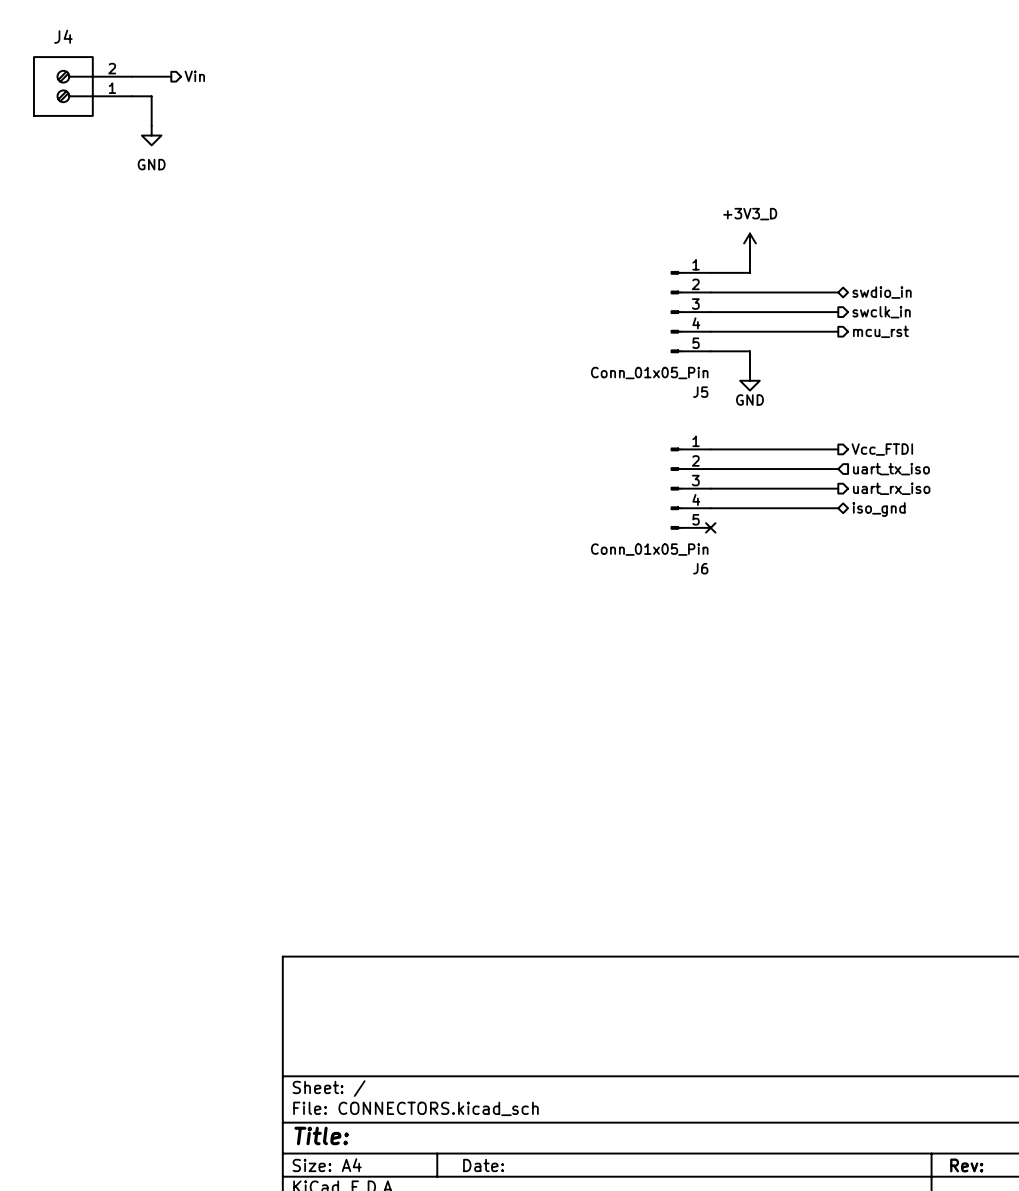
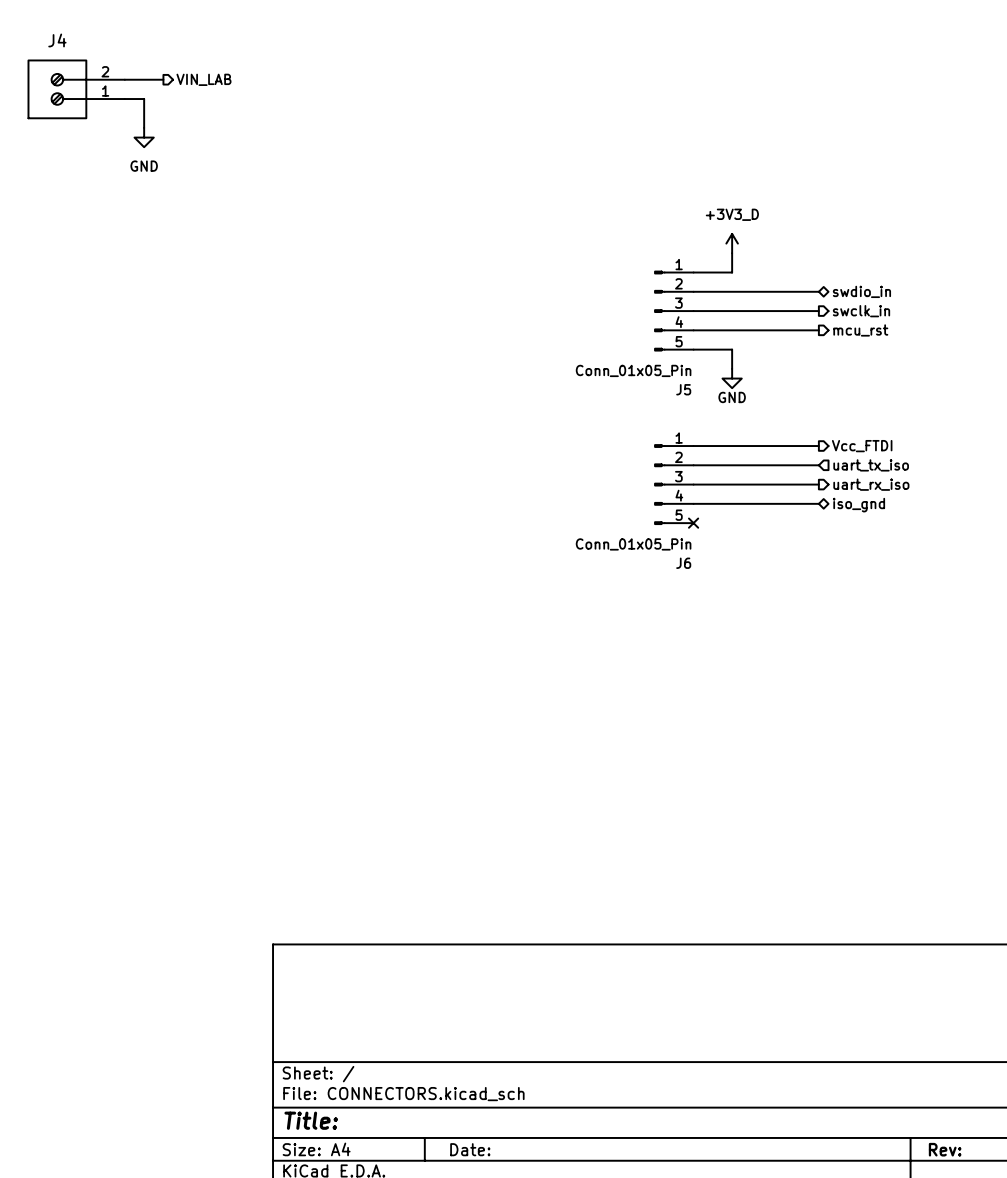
hierarchical label: Vin (194, 76) -> VIN_LAB (203, 79)

